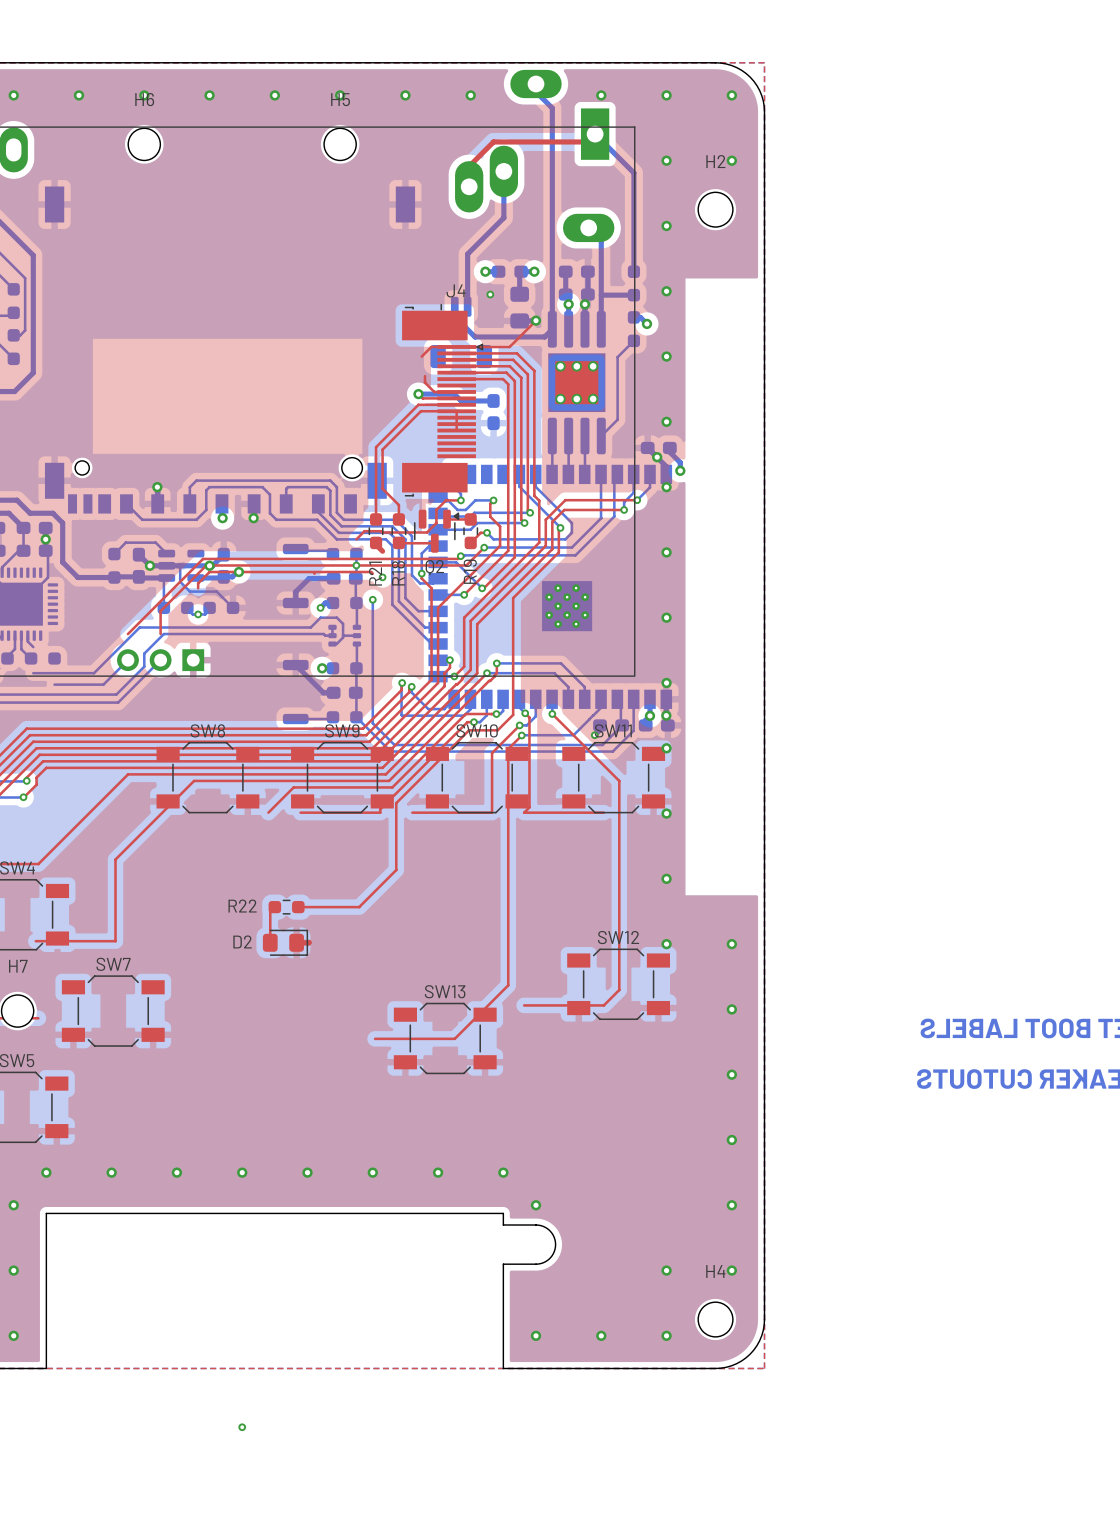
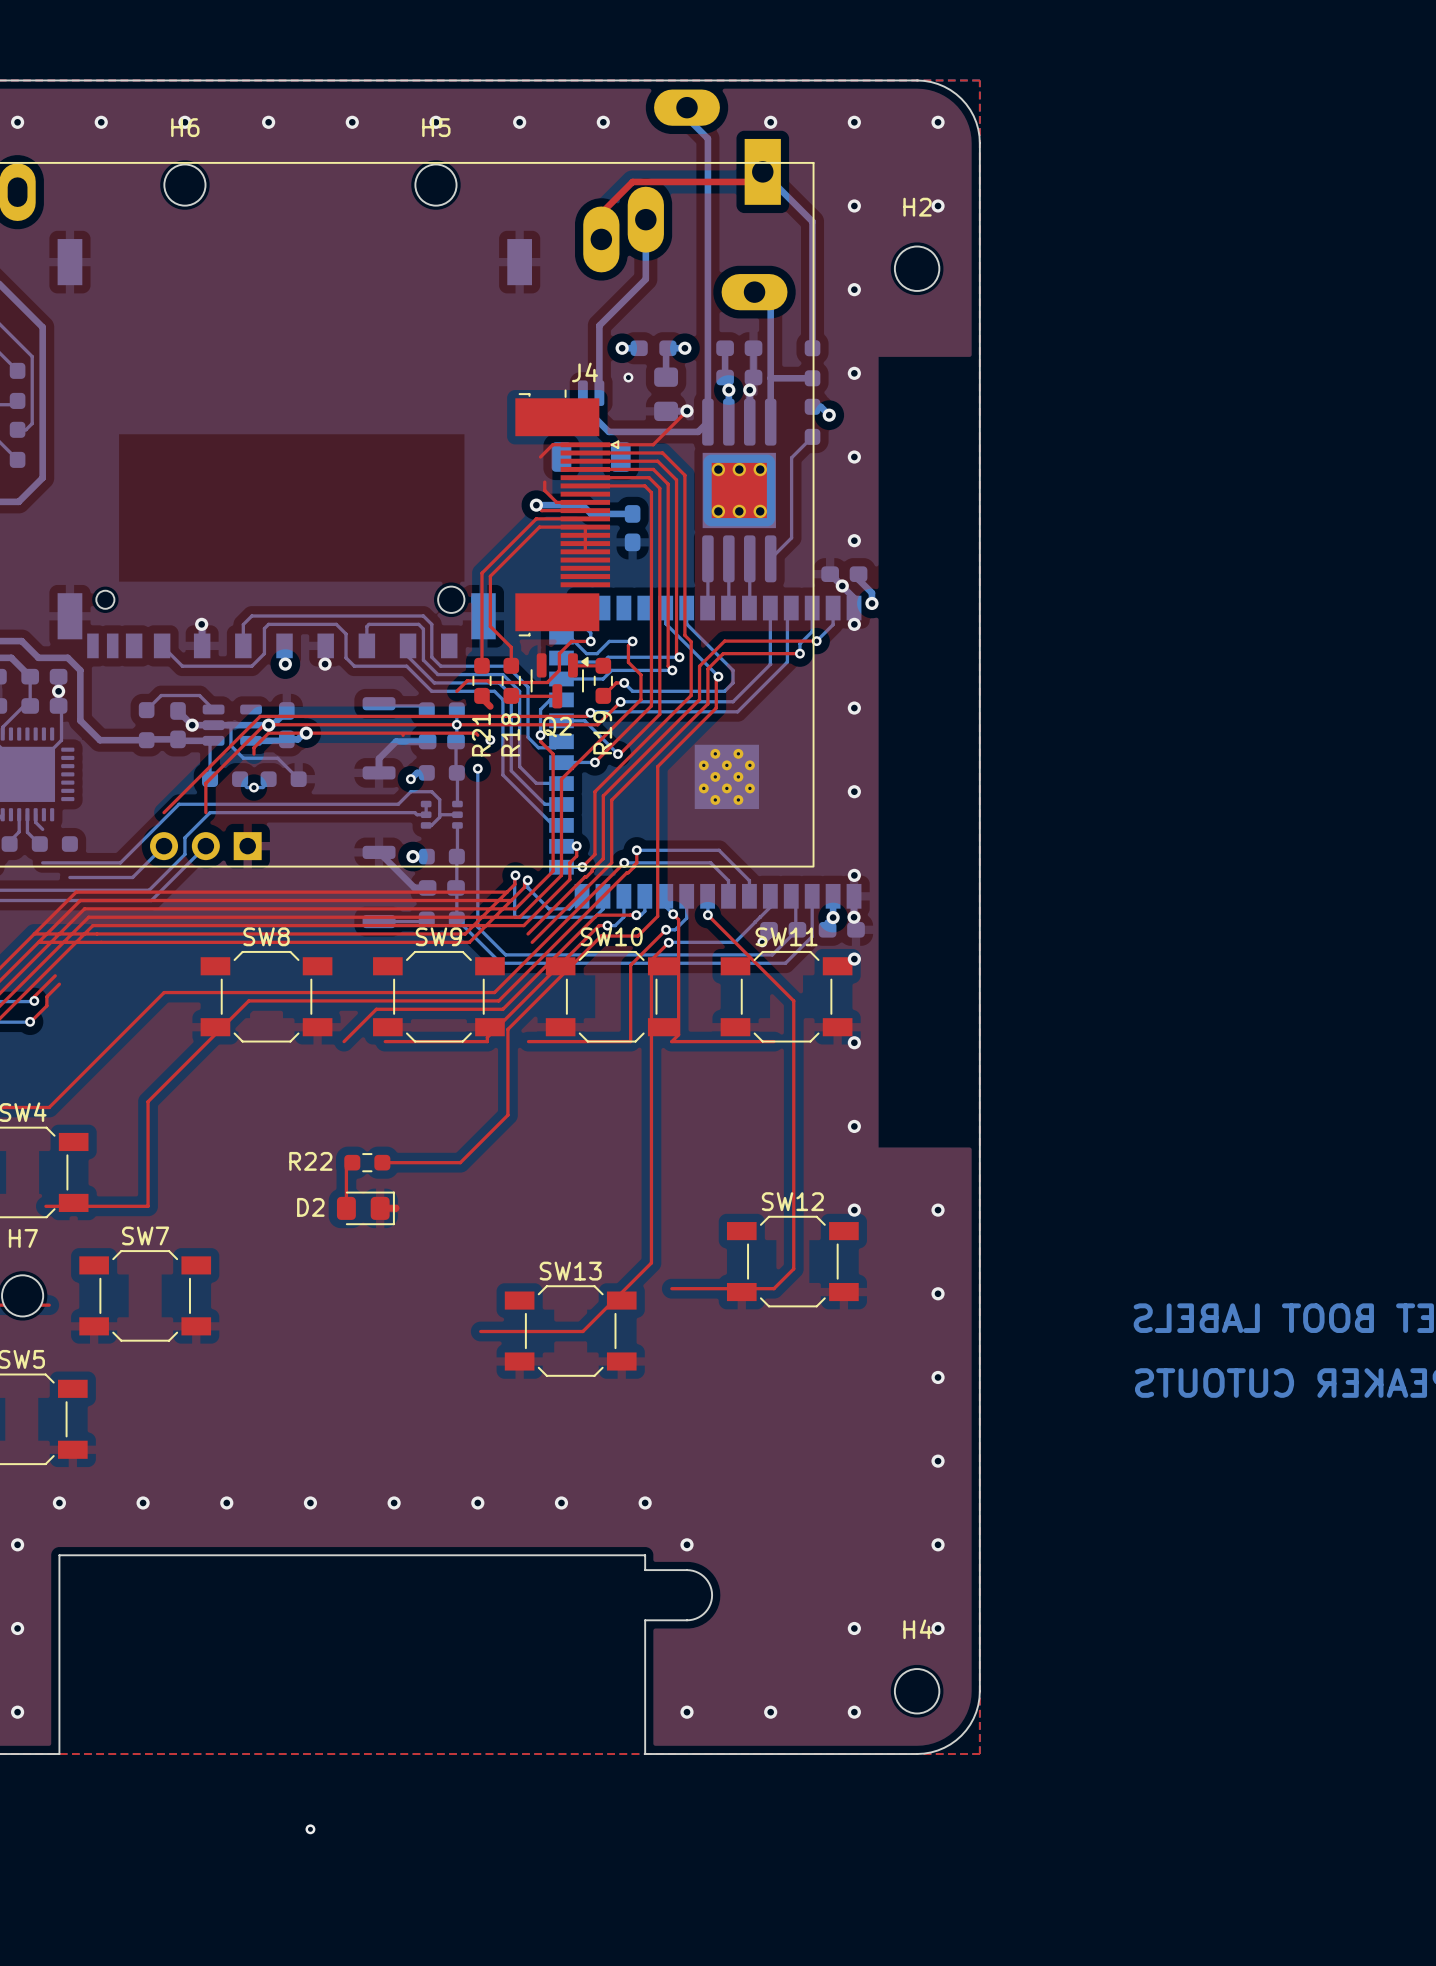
top track: none -> (507, 892) (76, 892) (34, 933)
top track: none -> (511, 900) (80, 900) (38, 942)
top track: (402, 709) (369, 741) (33, 741) -> (515, 908) (84, 908) (42, 950)
top track: (405, 715) (372, 748) (36, 748) -> (519, 917) (88, 917) (46, 959)
top track: (408, 722) (376, 754) (39, 754) -> (523, 925) (92, 925) (51, 967)
top track: (411, 728) (379, 761) (43, 761) -> none
top track: (415, 735) (382, 767) (46, 767) -> none

